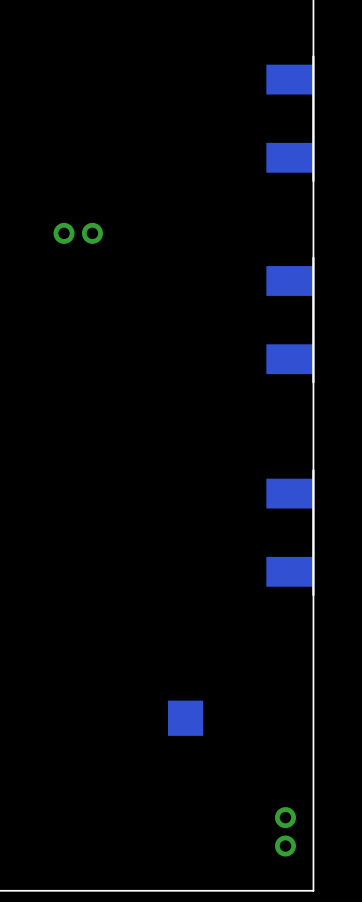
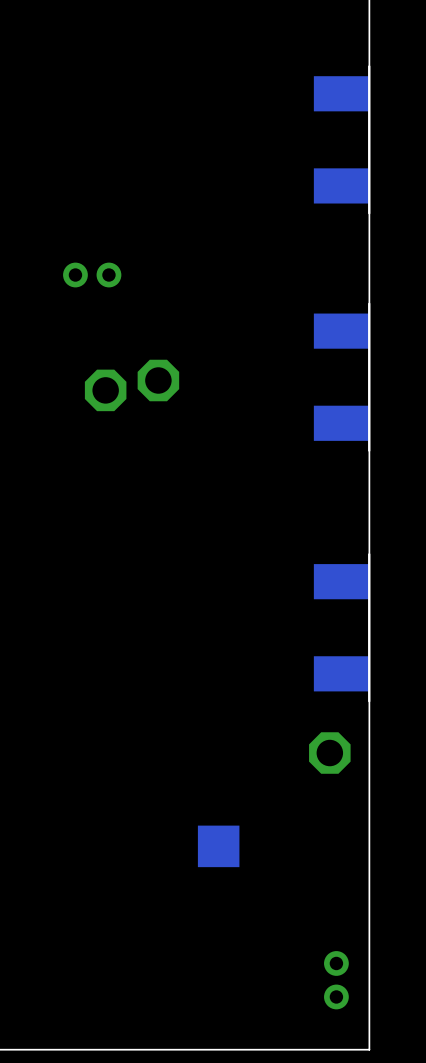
part: none -> (158, 380)
part: none -> (105, 390)
part: none -> (329, 753)

